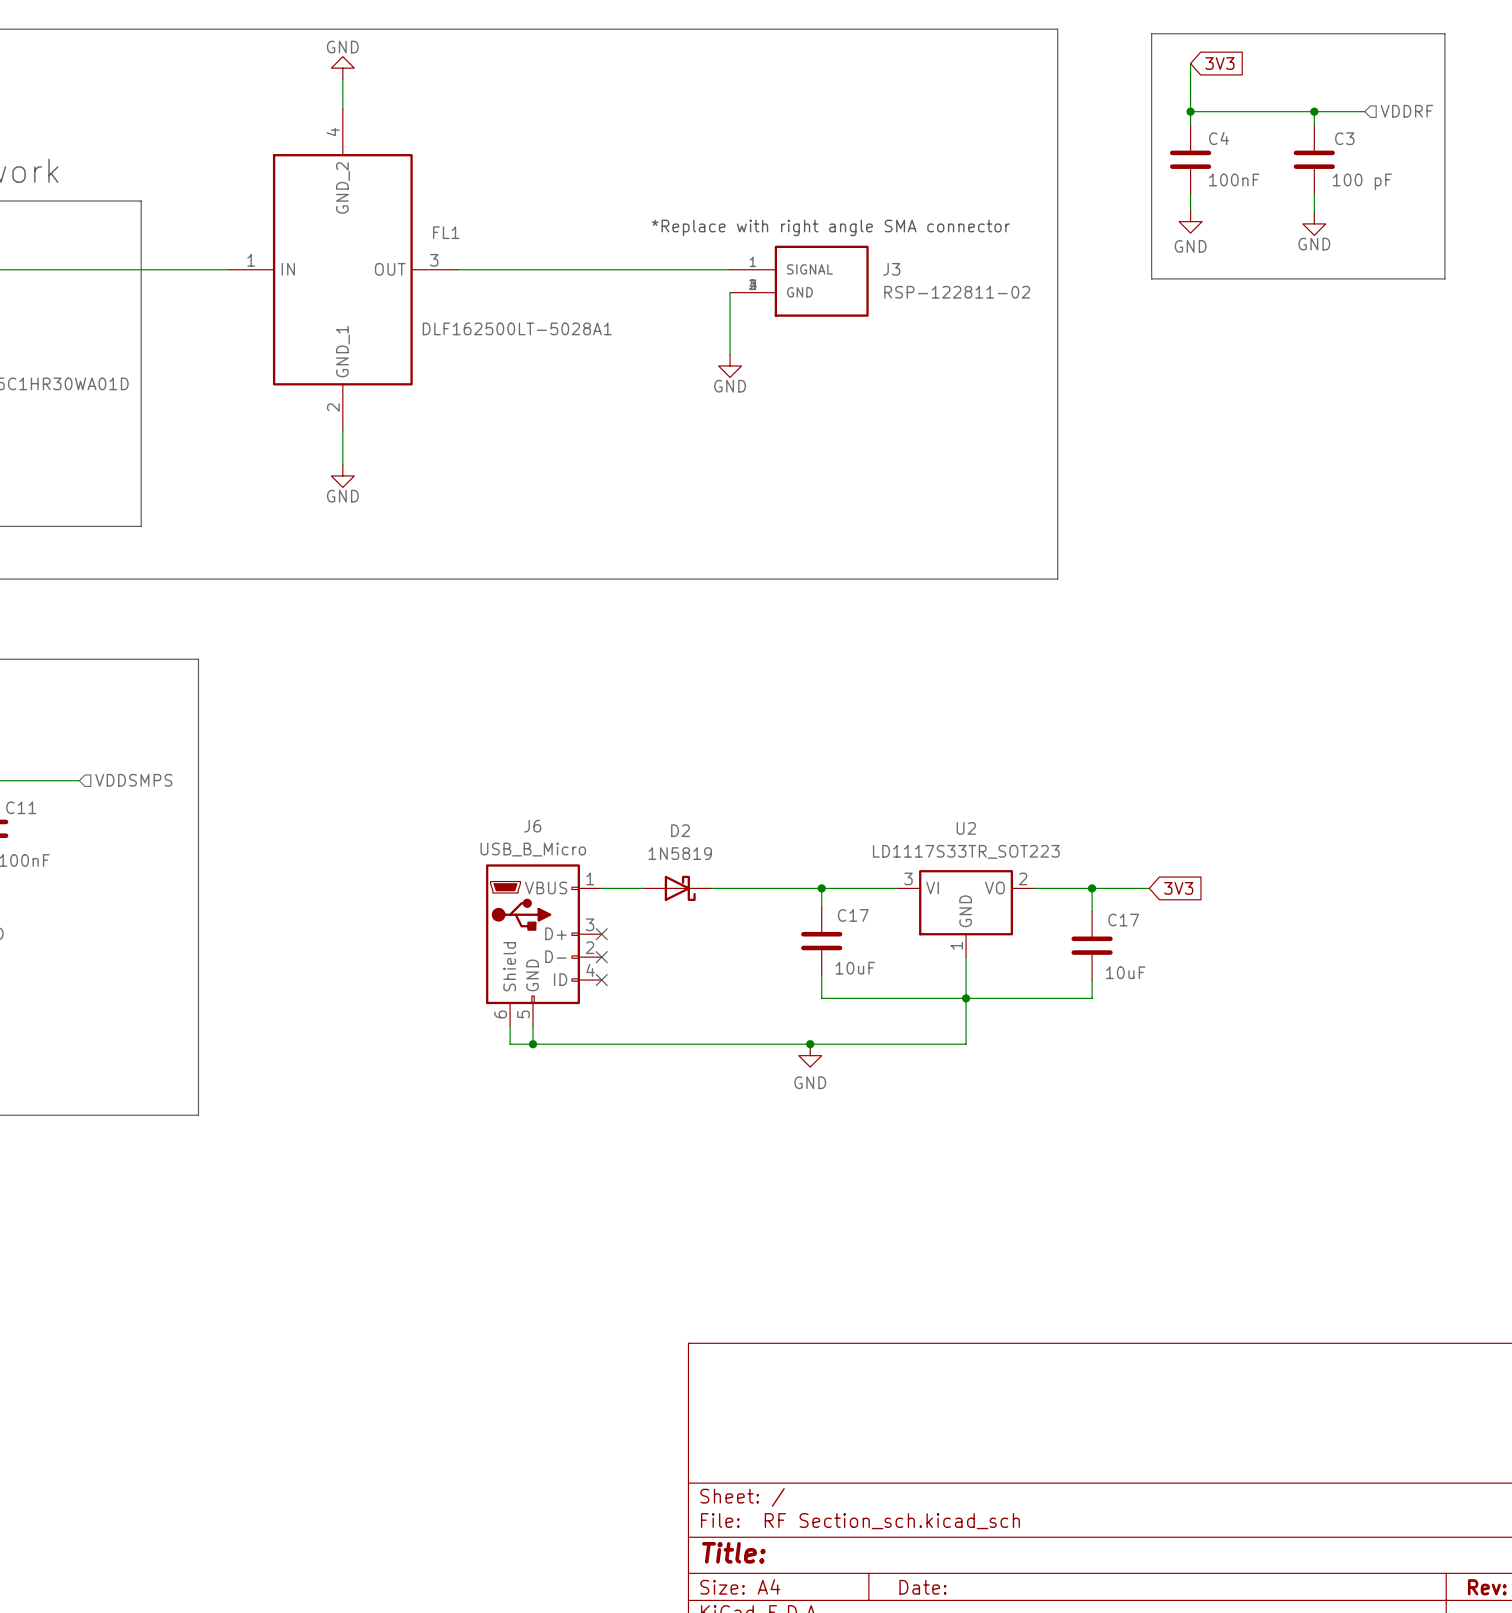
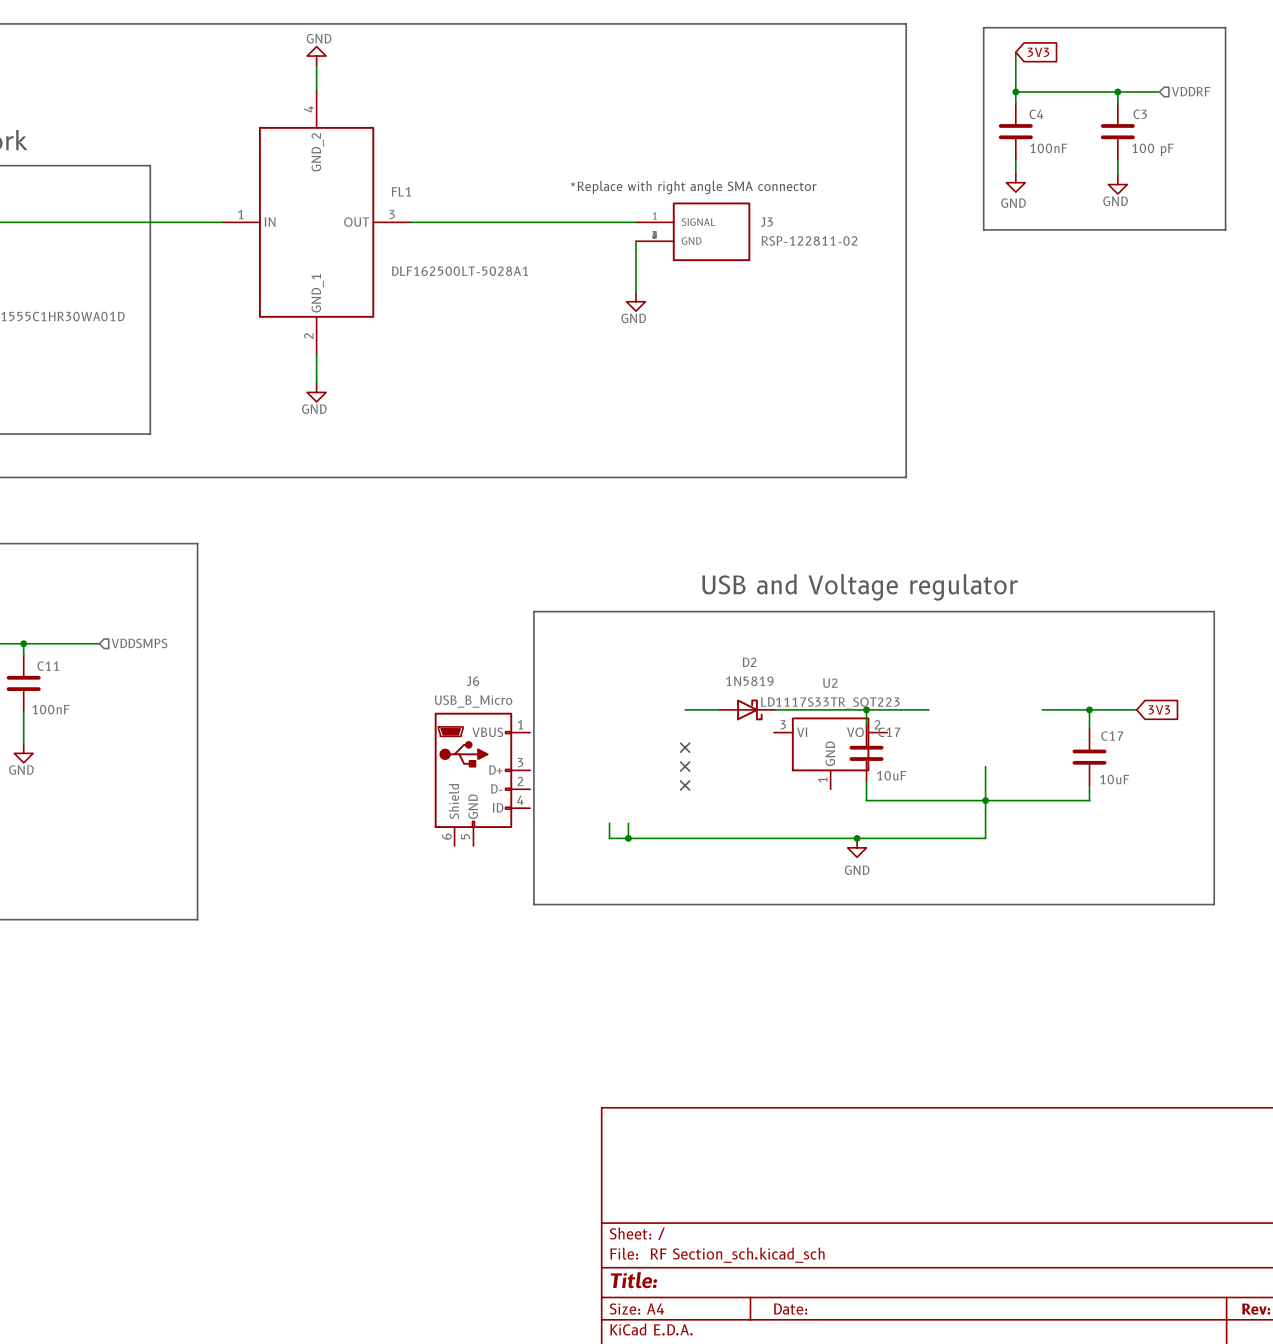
text: none -> USB and Voltage regulator (859, 587)
line: none -> (533, 611) (1214, 611) (1214, 904) (533, 904) (533, 611)
junction: none -> (866, 709)
junction: none -> (1089, 709)
wire: (601, 888) (642, 888) -> (685, 709) (719, 709)
D2 position: (677, 888) -> (747, 709)
wire: (711, 888) (897, 888) -> (775, 709) (928, 709)
wire: (821, 888) (821, 906) -> (866, 709) (866, 725)
junction: (821, 888) -> none
wire: (1034, 888) (1149, 888) -> (1042, 709) (1136, 709)
wire: (1092, 888) (1092, 911) -> (1089, 709) (1089, 728)
junction: (1092, 888) -> none
global label position: 3V3 (1178, 888) -> 3V3 (1159, 709)
no-connect mark: none -> (685, 747)
C17: none -> 10uF (1089, 757)
no-connect mark: none -> (685, 766)
no-connect mark: (601, 934) -> none
C17: 10uF (821, 941) -> none
C17 position: (1092, 945) -> (866, 753)
no-connect mark: none -> (685, 785)
no-connect mark: (601, 957) -> none
wire: (966, 957) (966, 1044) (510, 1044) (510, 1025) -> (985, 766) (985, 838) (609, 838) (609, 823)
junction: none -> (985, 800)
wire: (821, 975) (821, 998) (1092, 998) (1092, 980) -> (866, 781) (866, 800) (1089, 800) (1089, 785)
no-connect mark: (601, 980) -> none
junction position: (966, 998) -> (857, 838)
junction: none -> (628, 838)
wire: (533, 1025) (533, 1044) -> (628, 823) (628, 838)
junction: (533, 1044) -> none
junction: (810, 1044) -> none
power symbol position: GND (810, 1055) -> GND (857, 847)

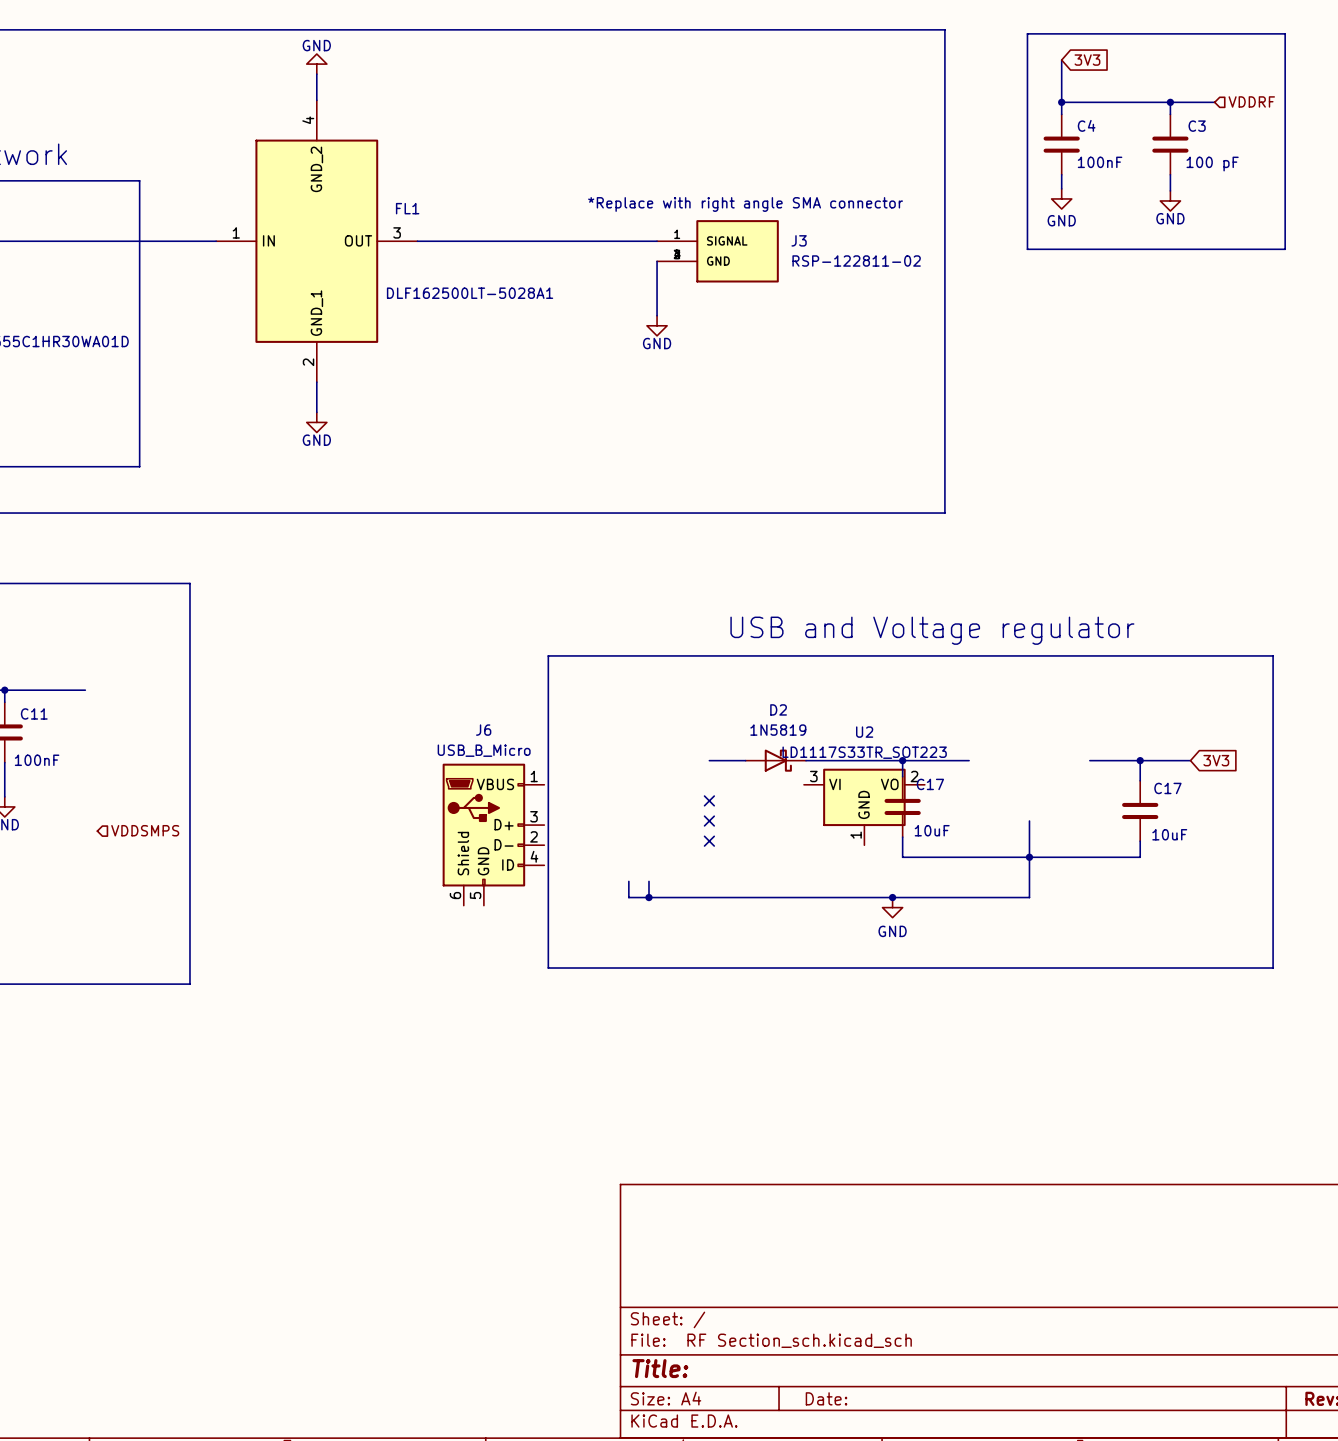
hierarchical label position: VDDSMPS (139, 643) -> VDDSMPS (145, 830)

